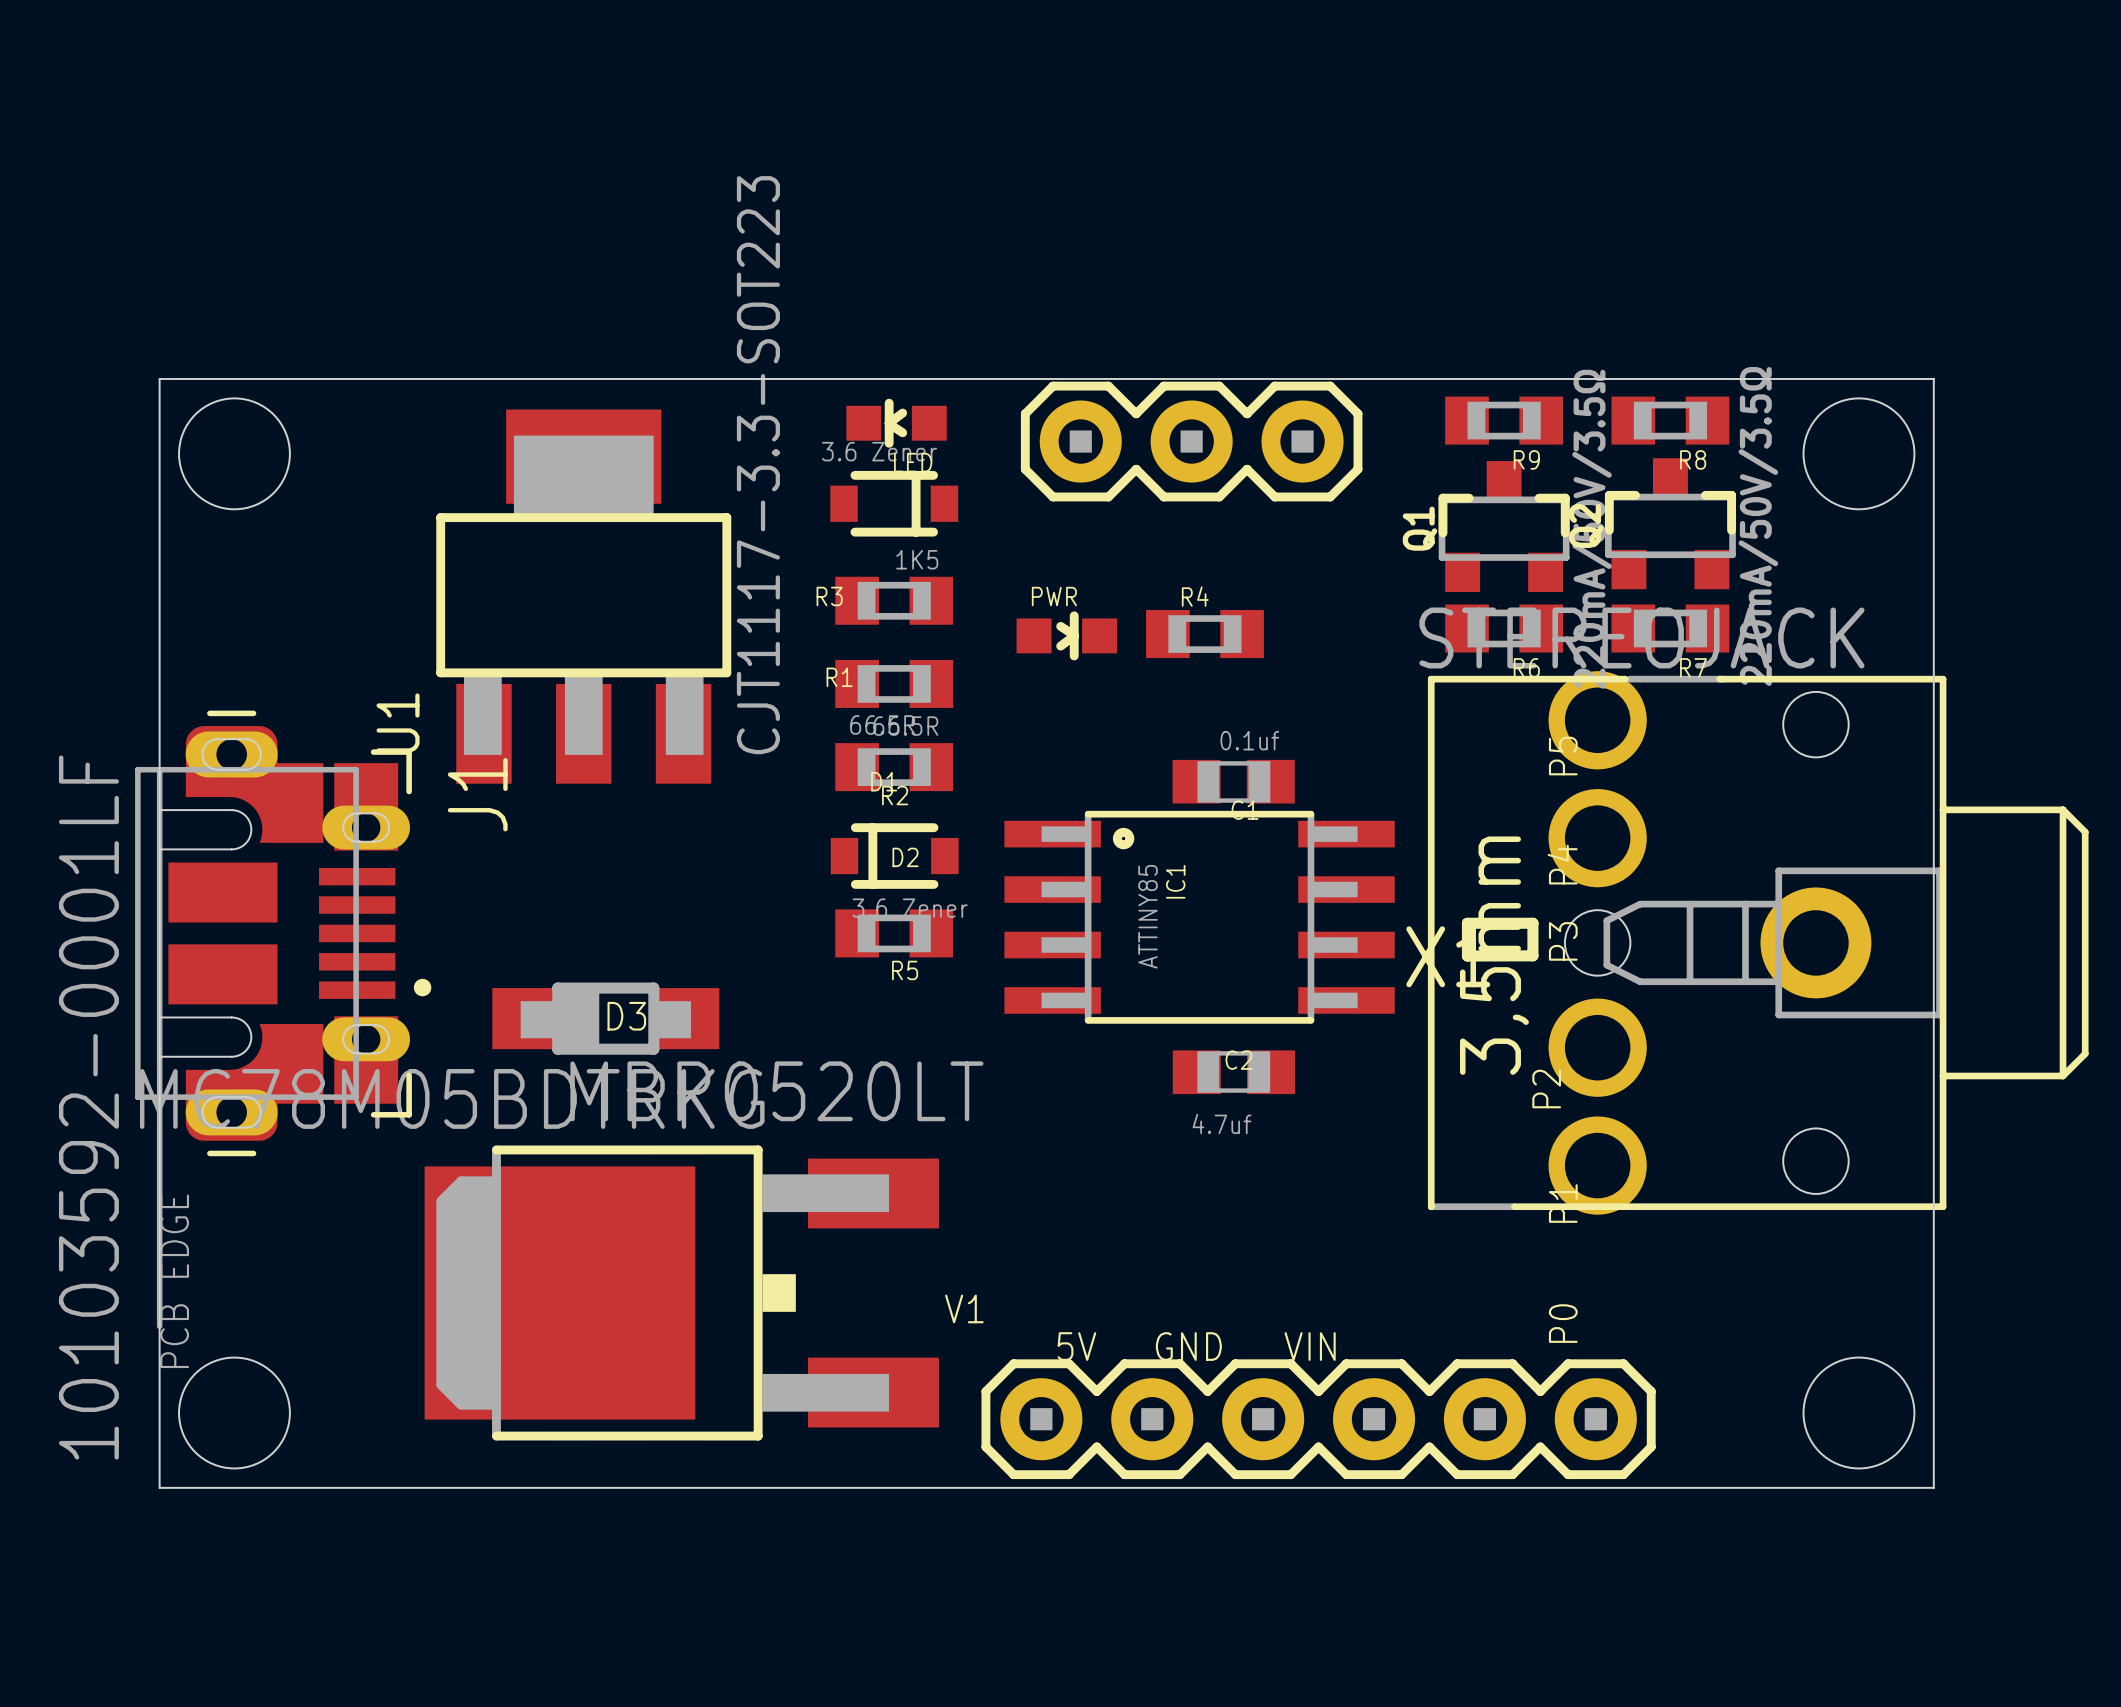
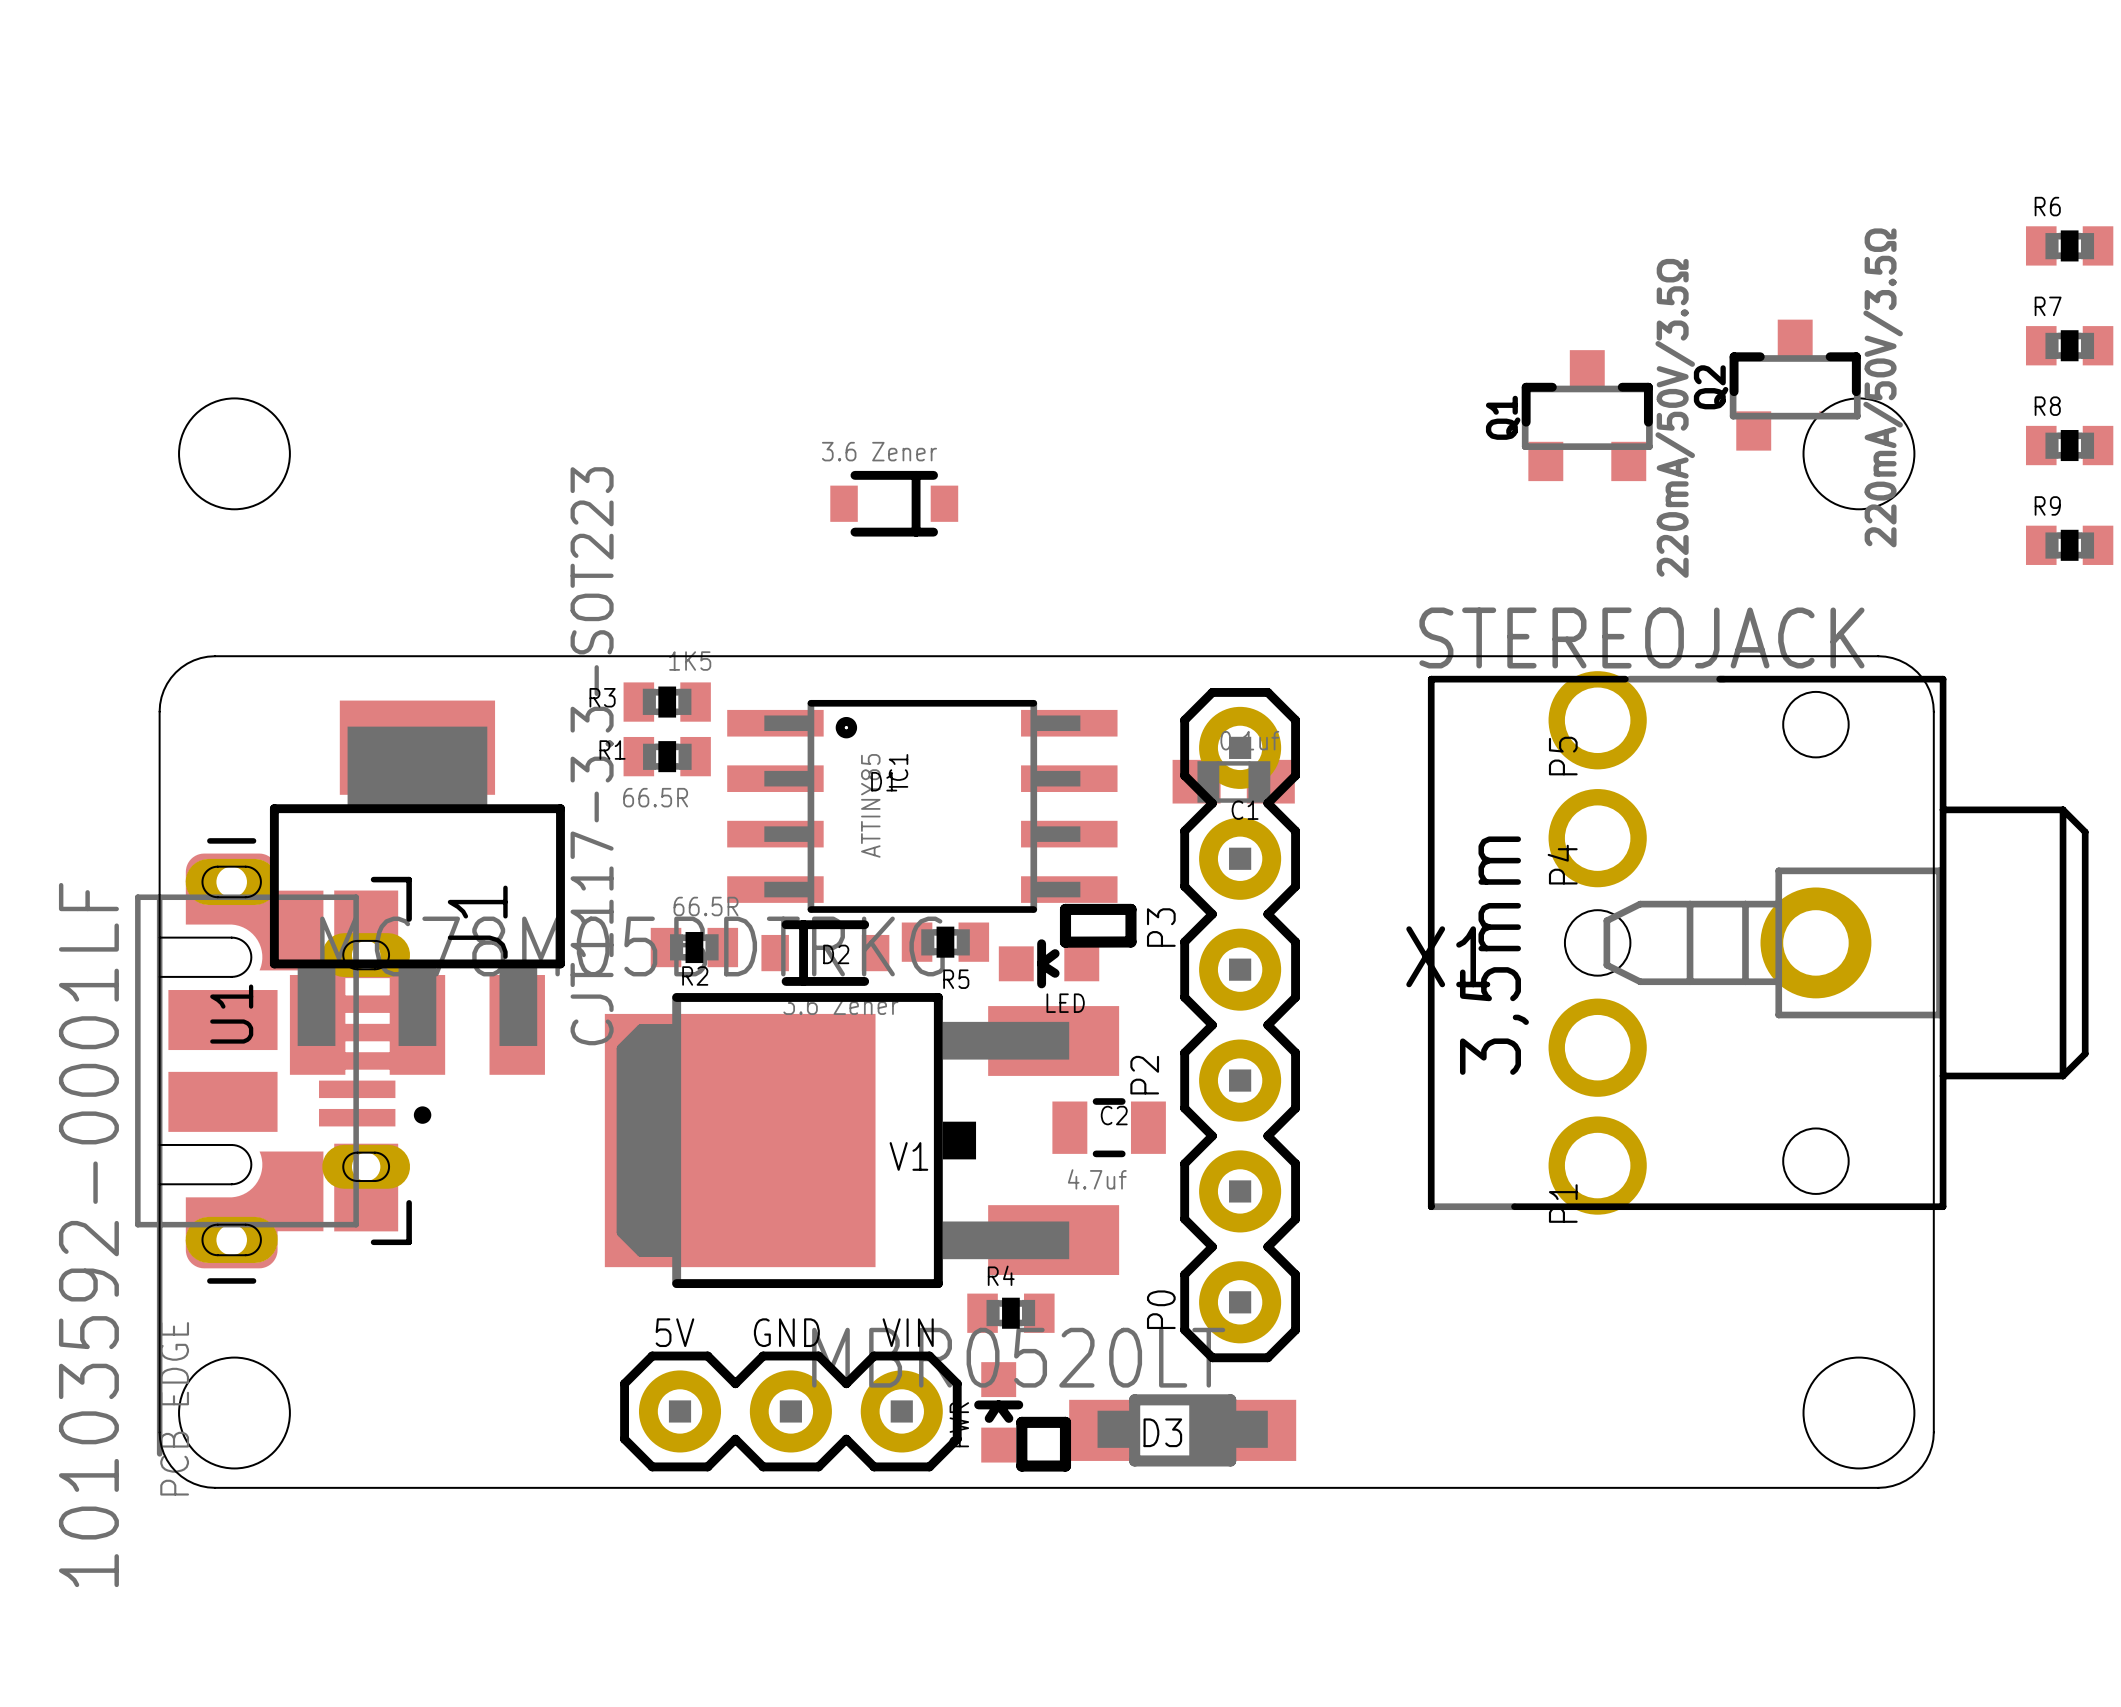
R9 footprint: [1445, 396, 1564, 445] -> [2025, 525, 2114, 565]
R8 footprint: [1611, 396, 1730, 445] -> [2025, 425, 2114, 466]
LED position: (896, 423) -> (1049, 963)
part position: (1191, 441) -> (790, 1411)
Q2 position: (1670, 523) -> (1795, 385)
Q1 position: (1504, 526) -> (1587, 415)
R3 footprint: [835, 576, 954, 625] -> [623, 682, 711, 722]
U1 position: (583, 596) -> (417, 887)
R6 footprint: [1445, 604, 1564, 653] -> [2025, 226, 2114, 266]
R7 footprint: [1611, 604, 1730, 653] -> [2025, 326, 2114, 366]
R4 footprint: [1146, 610, 1264, 659] -> [967, 1293, 1055, 1333]
PWR rotation: 0° (1066, 635) -> 90° counterclockwise (998, 1412)
PWR position: (1066, 635) -> (998, 1412)
R1 footprint: [835, 659, 954, 708] -> [623, 736, 711, 777]
board edge: (159, 711) (159, 378) (1933, 378) (1933, 711) -> (159, 711) (163, 690) (175, 672) (193, 660) (215, 656) (1878, 656) (1899, 660) (1917, 672) (1929, 690) (1933, 711)
R2 footprint: [835, 743, 954, 792] -> [650, 927, 739, 968]
D2 position: (894, 856) -> (825, 953)
R5 footprint: [835, 909, 954, 958] -> [901, 922, 990, 962]
IC1 position: (1199, 917) -> (922, 806)
line: (1467, 923) (1532, 923) (1532, 955) (1467, 956) (1467, 923) -> (1065, 909) (1130, 909) (1130, 941) (1065, 942) (1065, 909)
text position: P3 (1563, 941) -> P3 (1161, 927)
D3 rotation: 0° (605, 1018) -> 180° (1182, 1430)
D3 position: (605, 1018) -> (1182, 1430)
J1 position: (283, 1019) -> (283, 1147)
C2 footprint: [1172, 1050, 1296, 1095] -> [1052, 1098, 1166, 1158]
text position: P2 (1546, 1089) -> P2 (1144, 1075)
V1 footprint: [424, 1145, 939, 1441] -> [604, 993, 1120, 1289]
V1 name position: V1 (964, 1308) -> V1 (908, 1156)
text position: P0 (1563, 1323) -> P0 (1161, 1309)
text position: 5V (1076, 1346) -> 5V (674, 1332)
text position: GND (1188, 1346) -> GND (786, 1332)
text position: VIN (1310, 1346) -> VIN (908, 1332)
part rotation: 0° (1318, 1419) -> 90° clockwise (1240, 1025)
line: none -> (1021, 1422) (1021, 1466) (1065, 1466) (1065, 1422) (1021, 1422)
board edge: (159, 1432) (159, 1487) (215, 1487) -> (159, 1432) (163, 1453) (175, 1471) (193, 1483) (215, 1487)
board edge: (1933, 1432) (1933, 1487) (1878, 1487) -> (1933, 1432) (1929, 1453) (1917, 1471) (1899, 1483) (1878, 1487)

